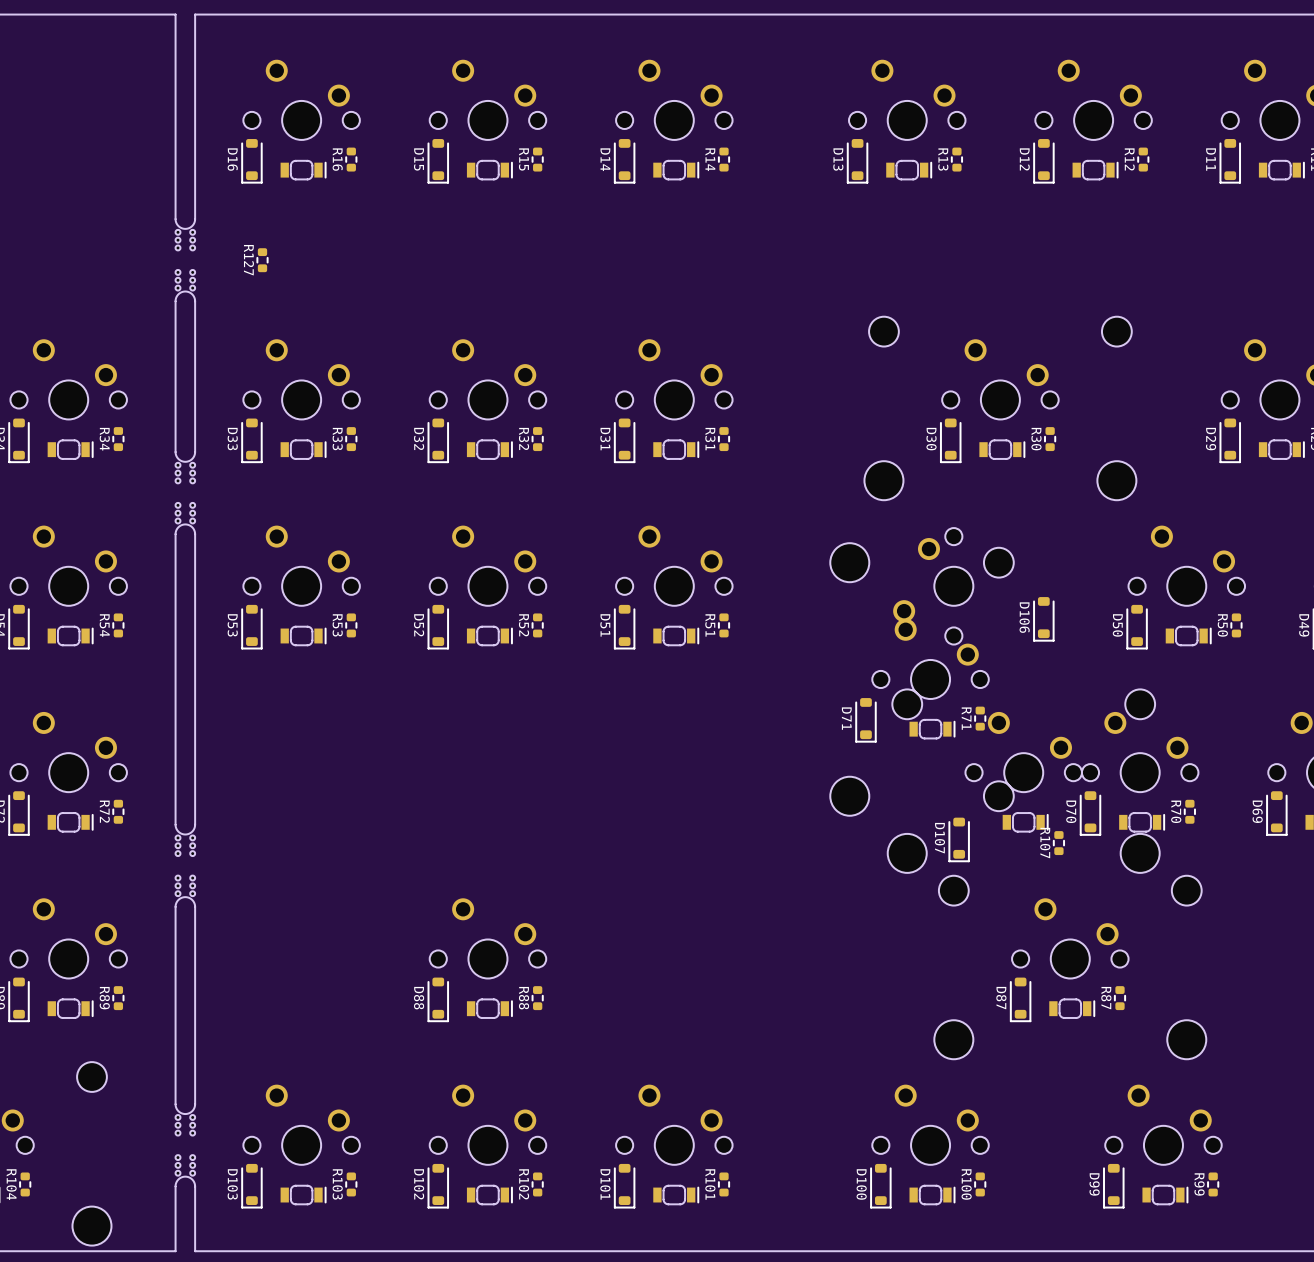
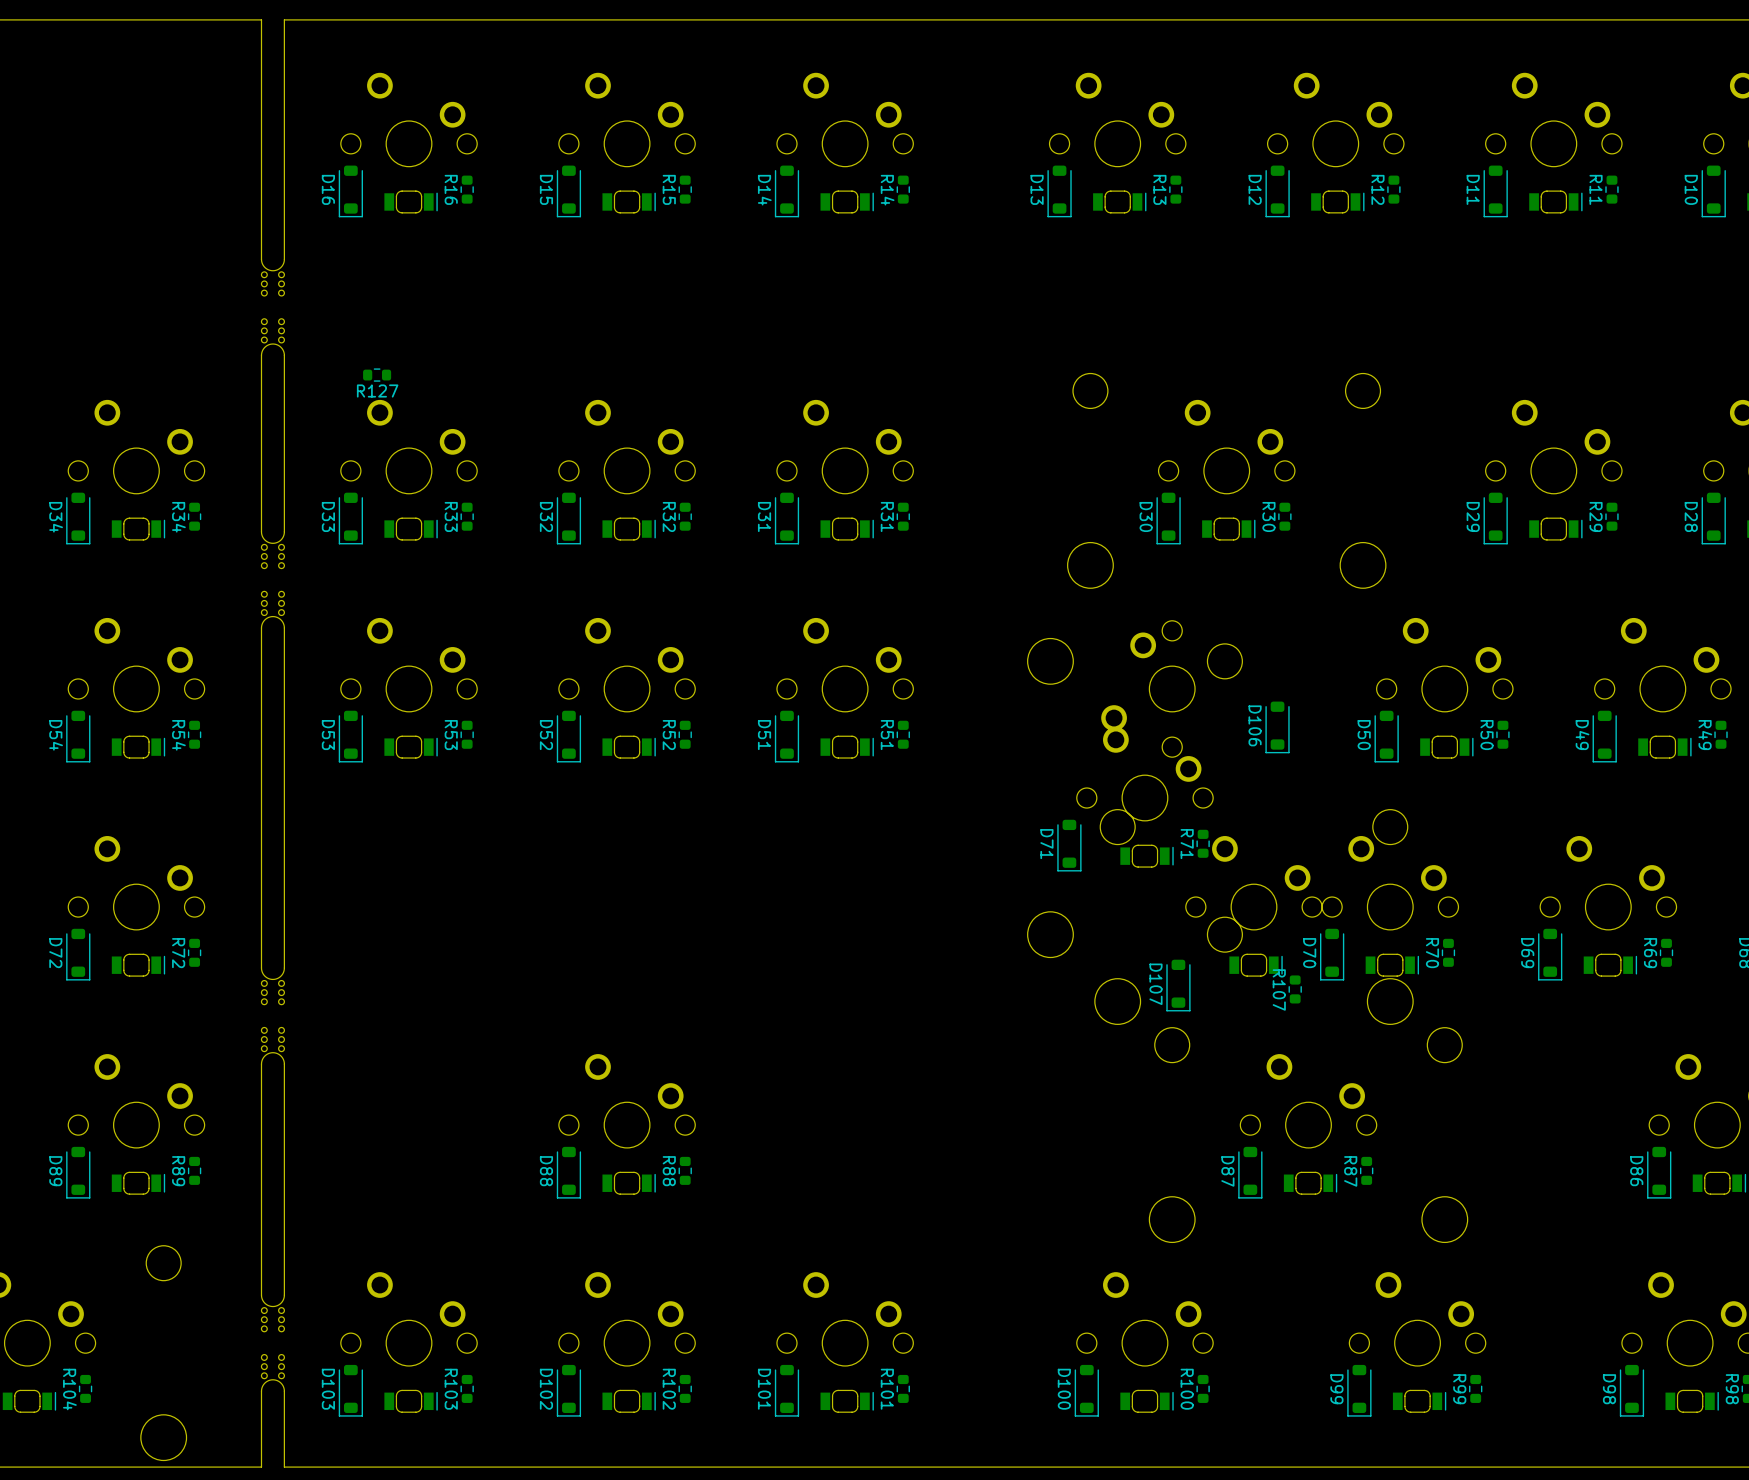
R127 name position: R127 (248, 260) -> R127 (377, 390)
R127 rotation: 0° (262, 260) -> 90° clockwise (377, 375)
R127 position: (262, 260) -> (377, 375)

